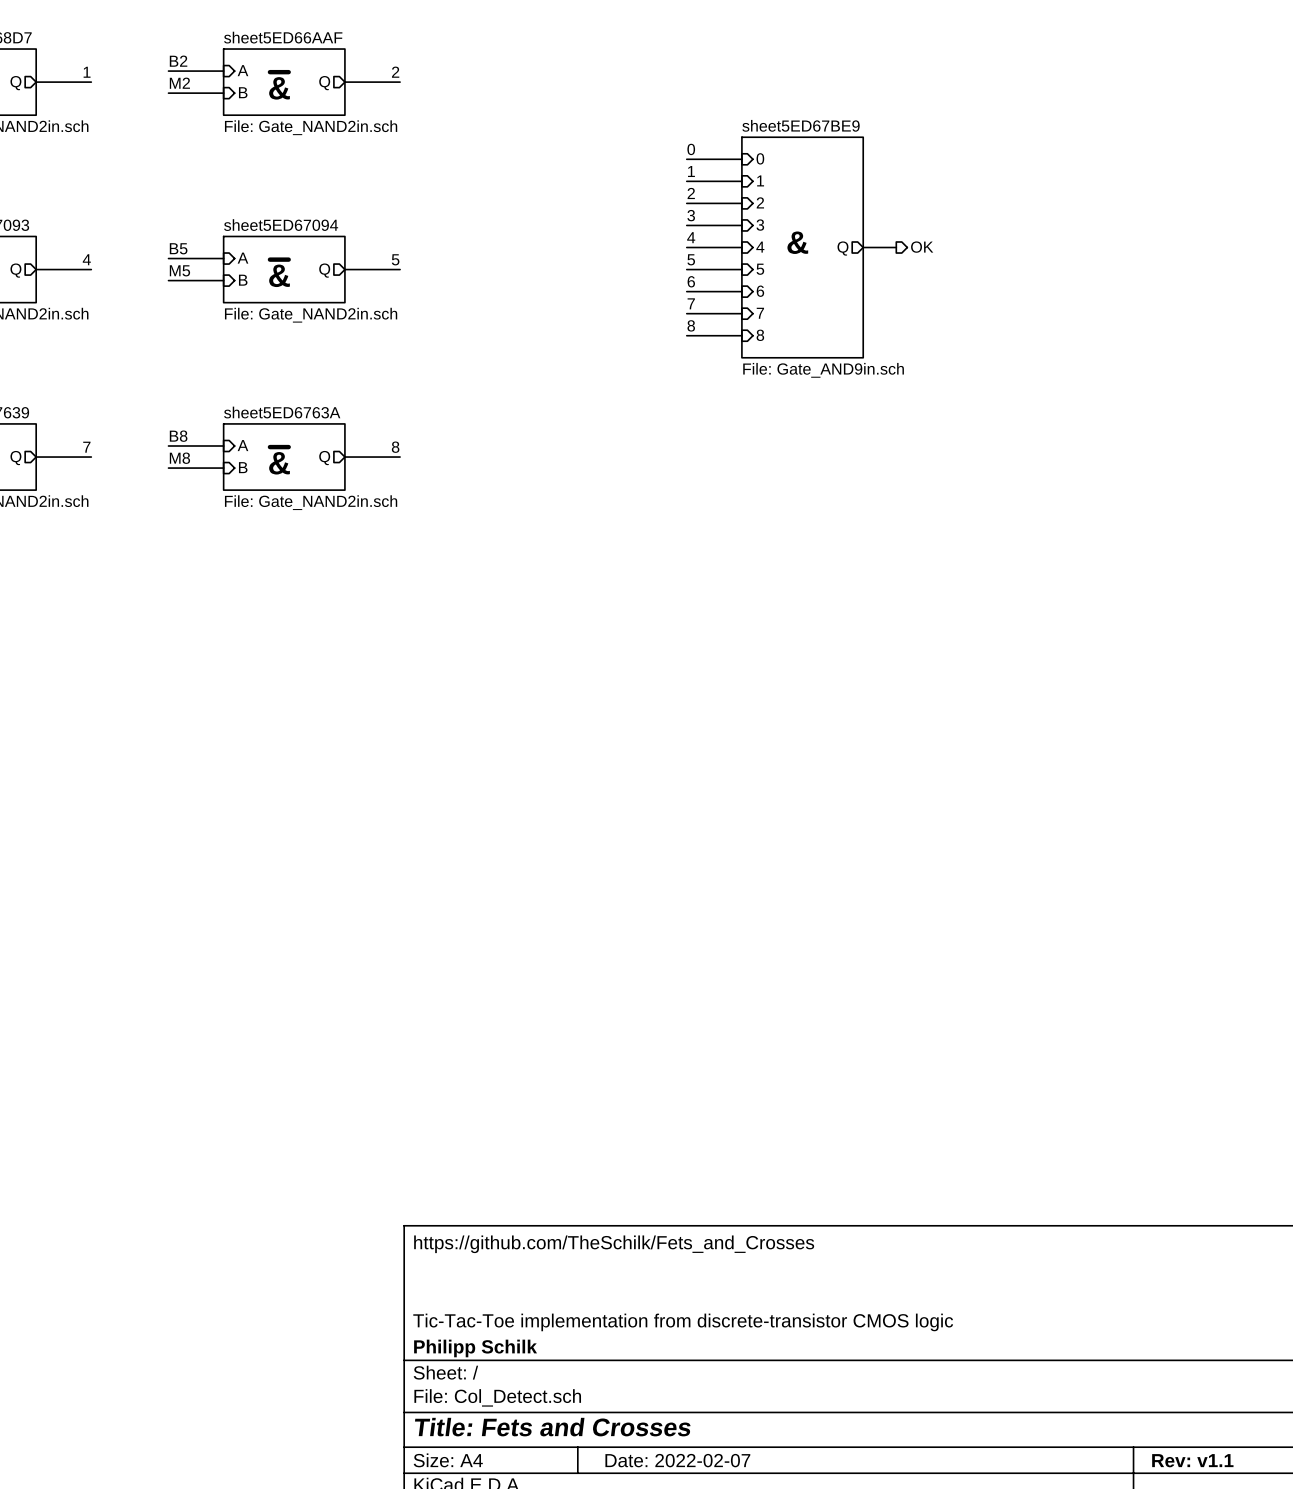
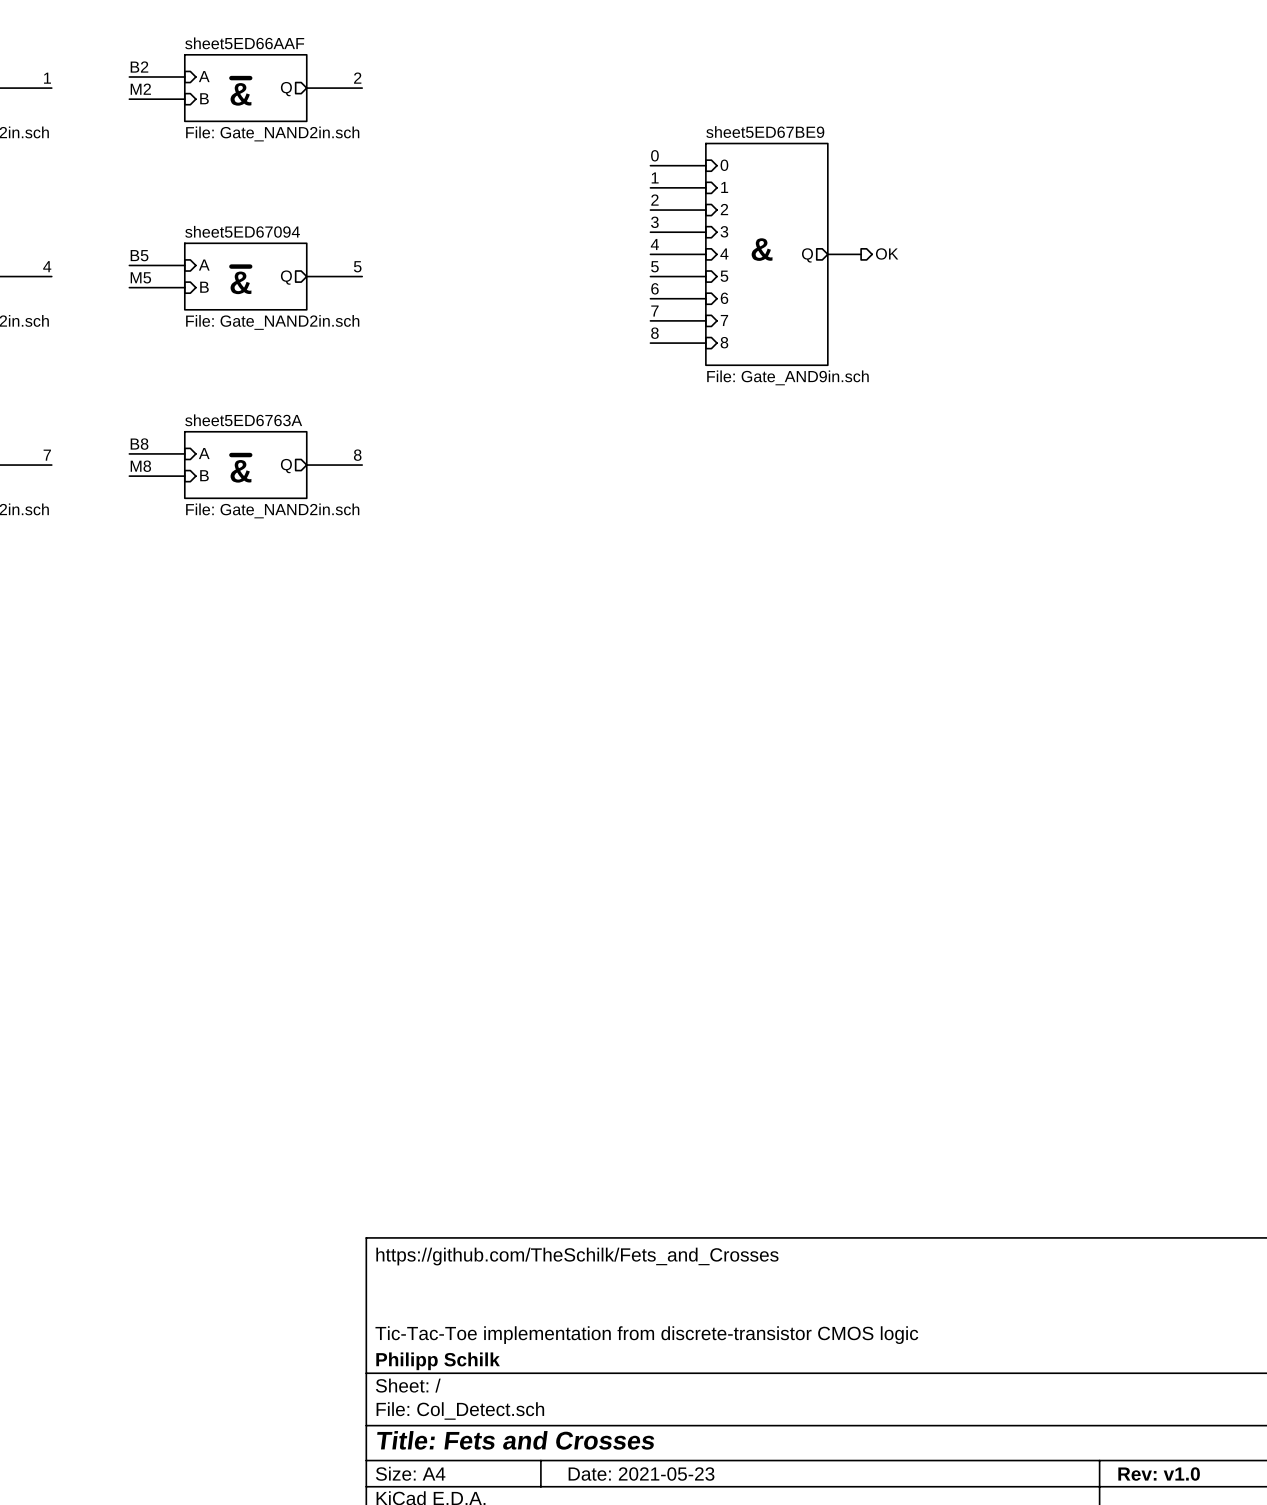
title block: Date: 2022-02-07 (677, 1460) -> Date: 2021-05-23 (641, 1474)
title block: Rev: v1.1 (1192, 1460) -> Rev: v1.0 (1159, 1474)

